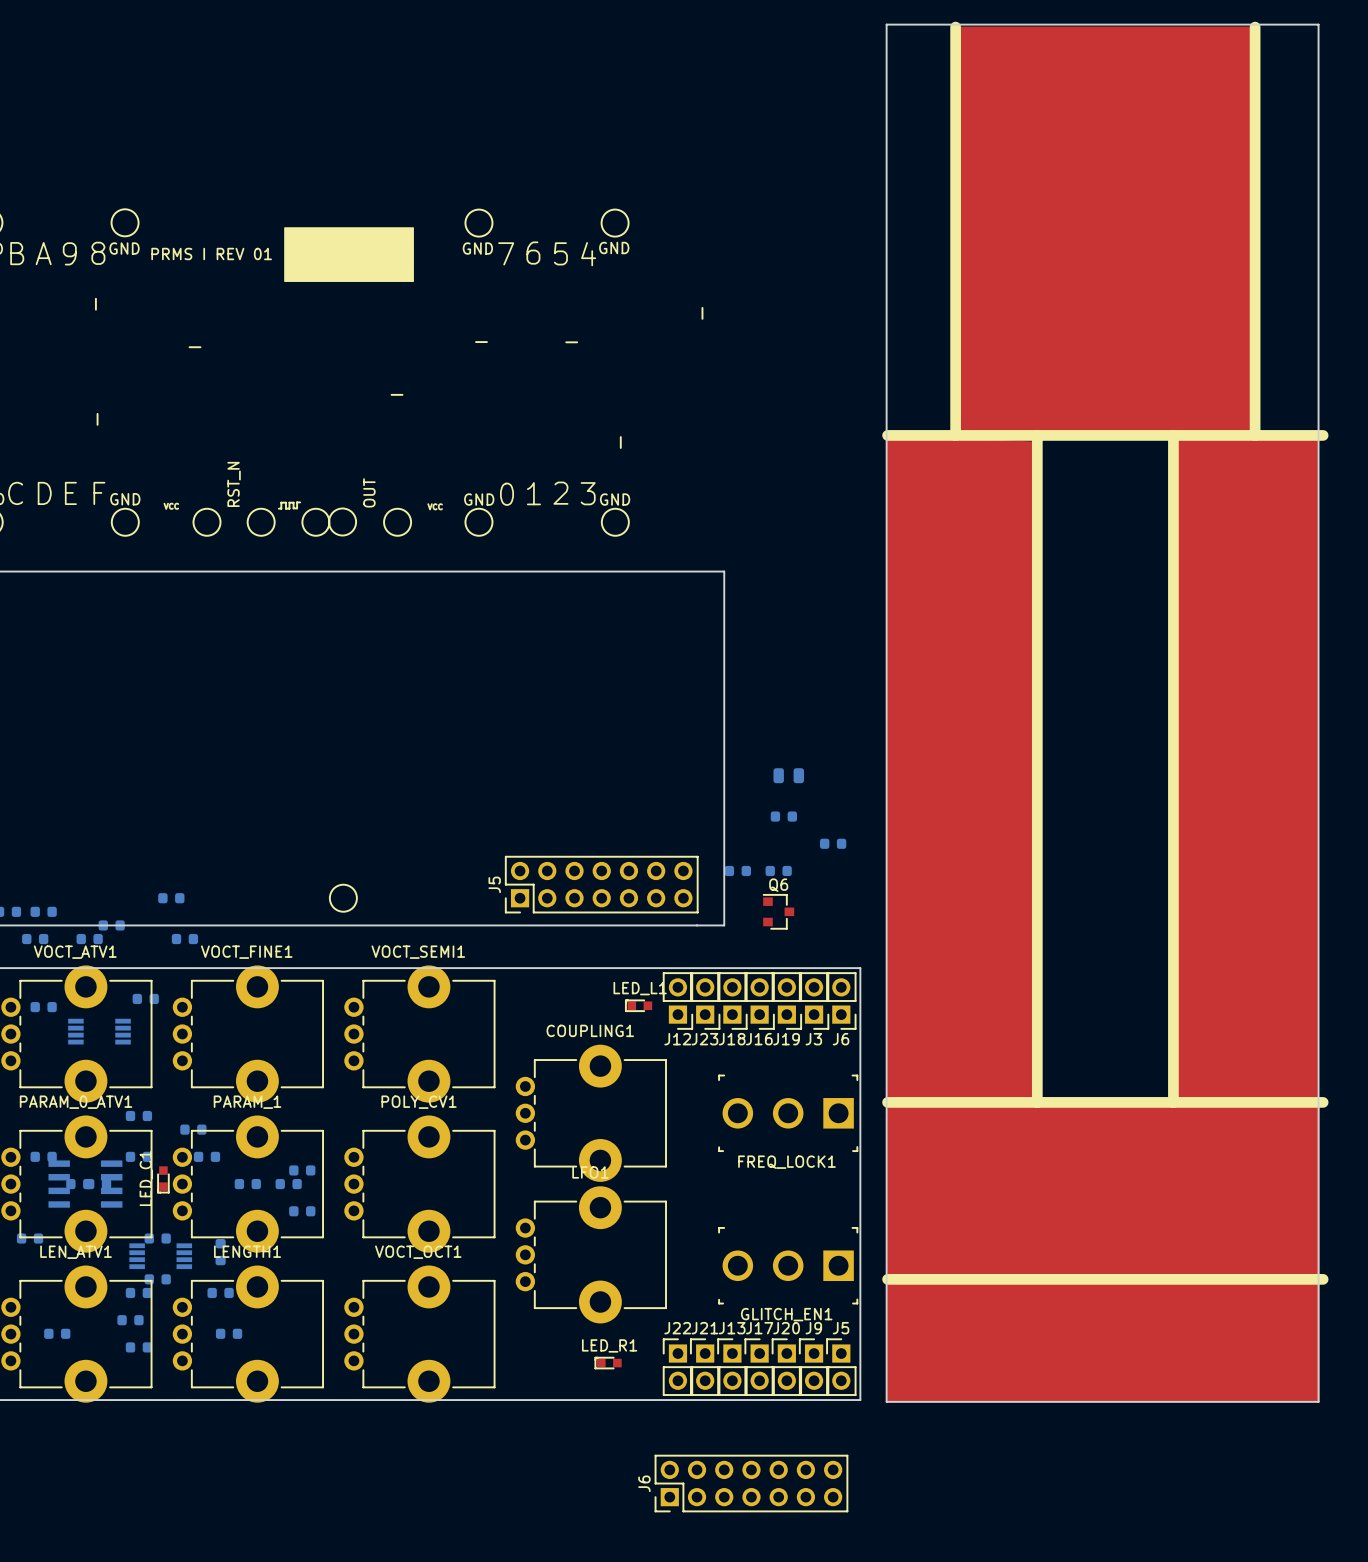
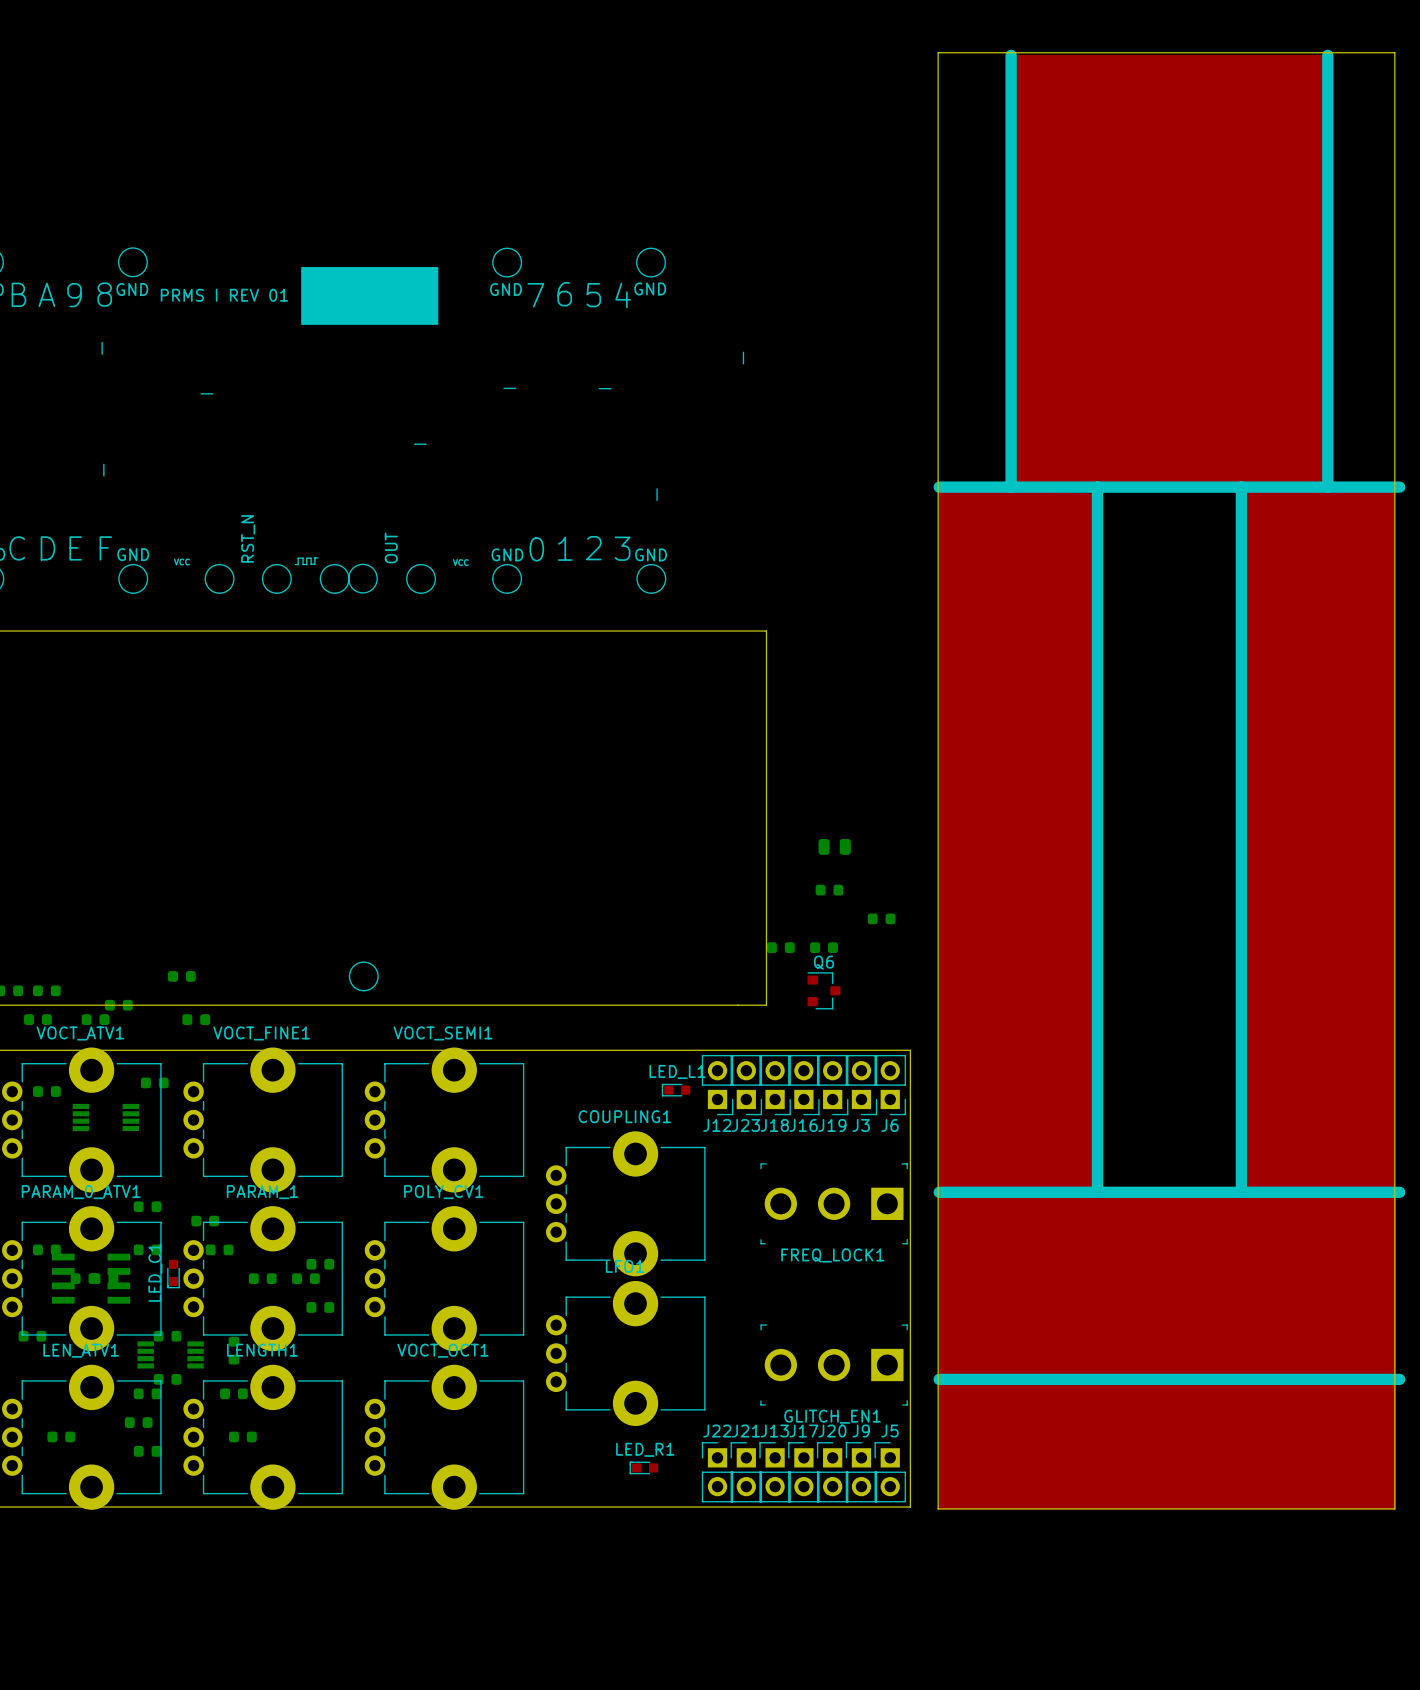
J5: (601, 884) -> none
J6: (751, 1483) -> none

